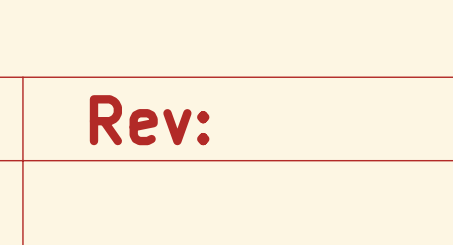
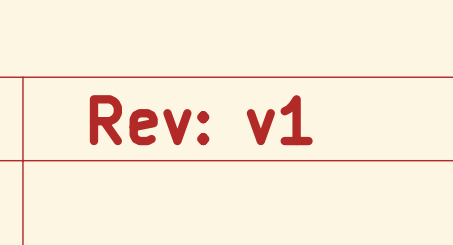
title block: Rev: (149, 120) -> Rev: v1 (201, 120)

